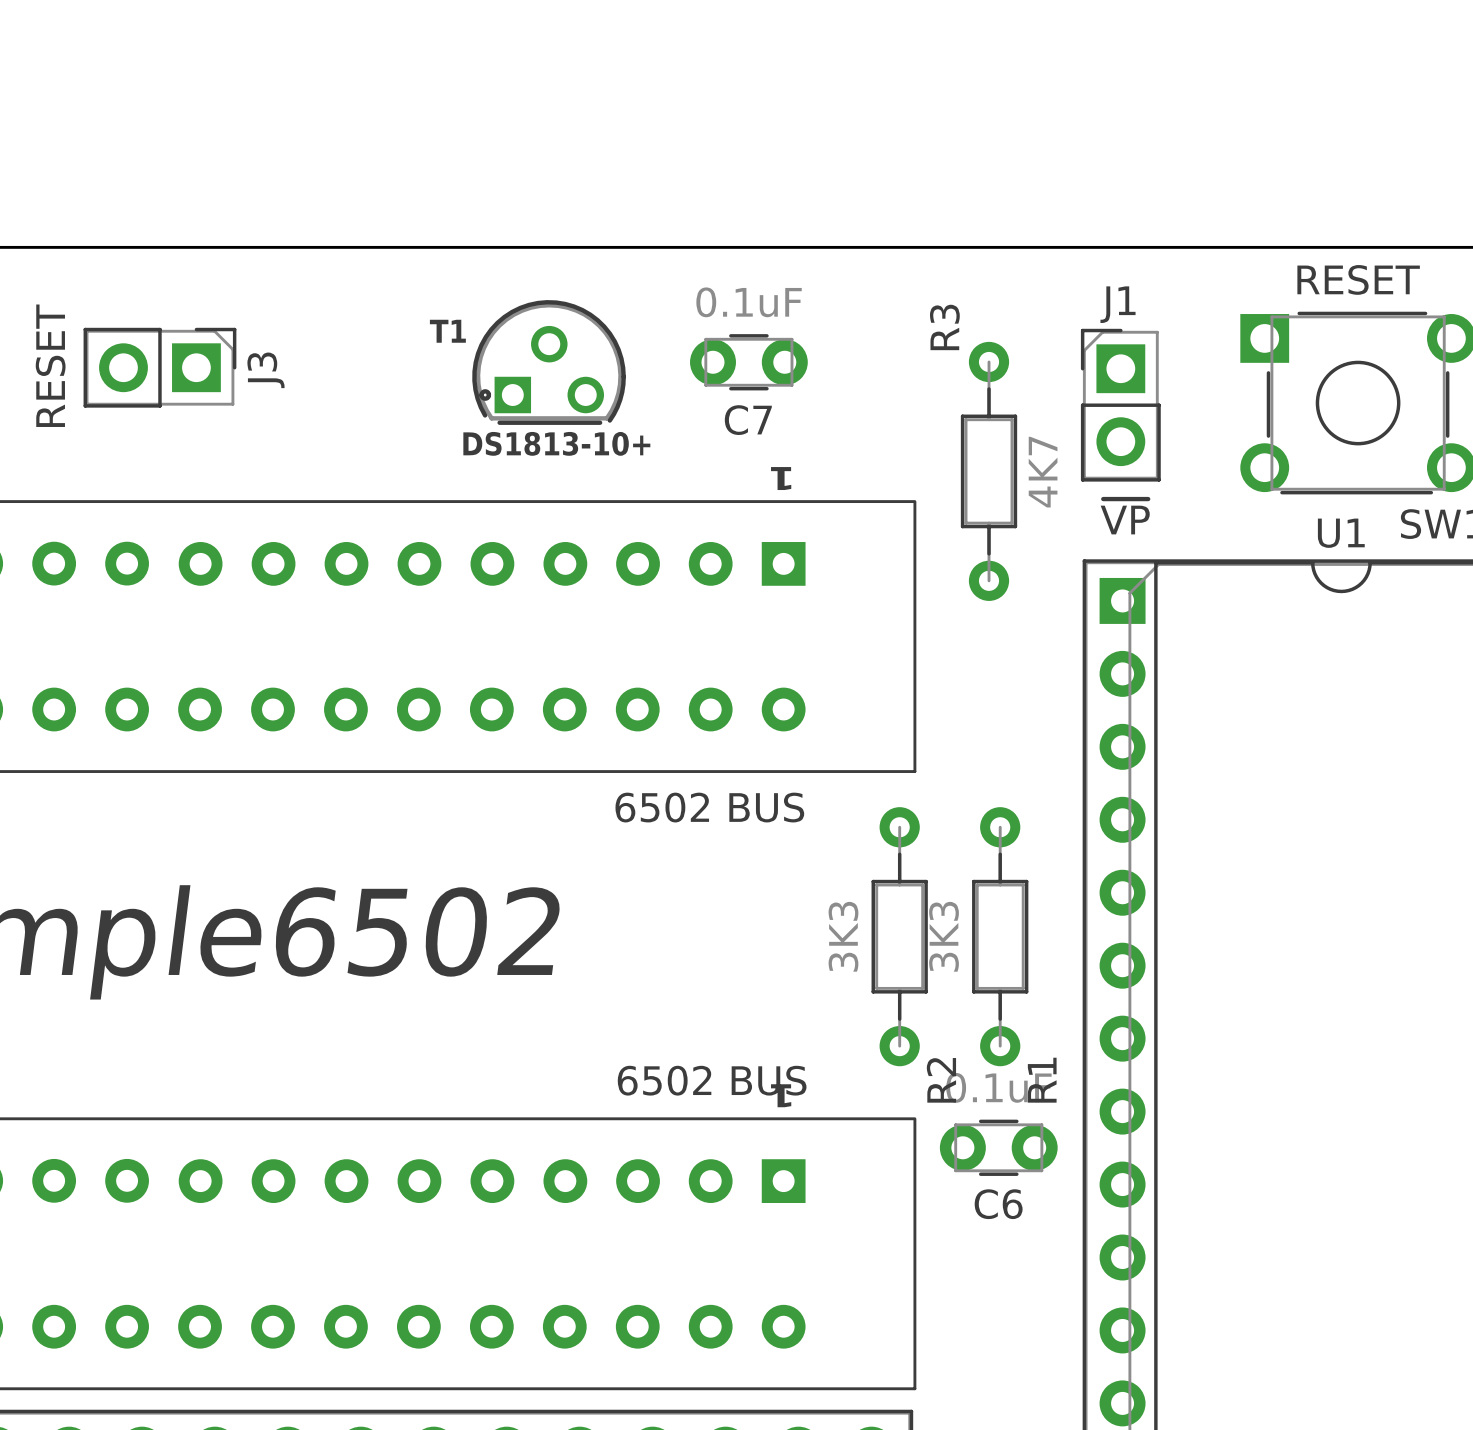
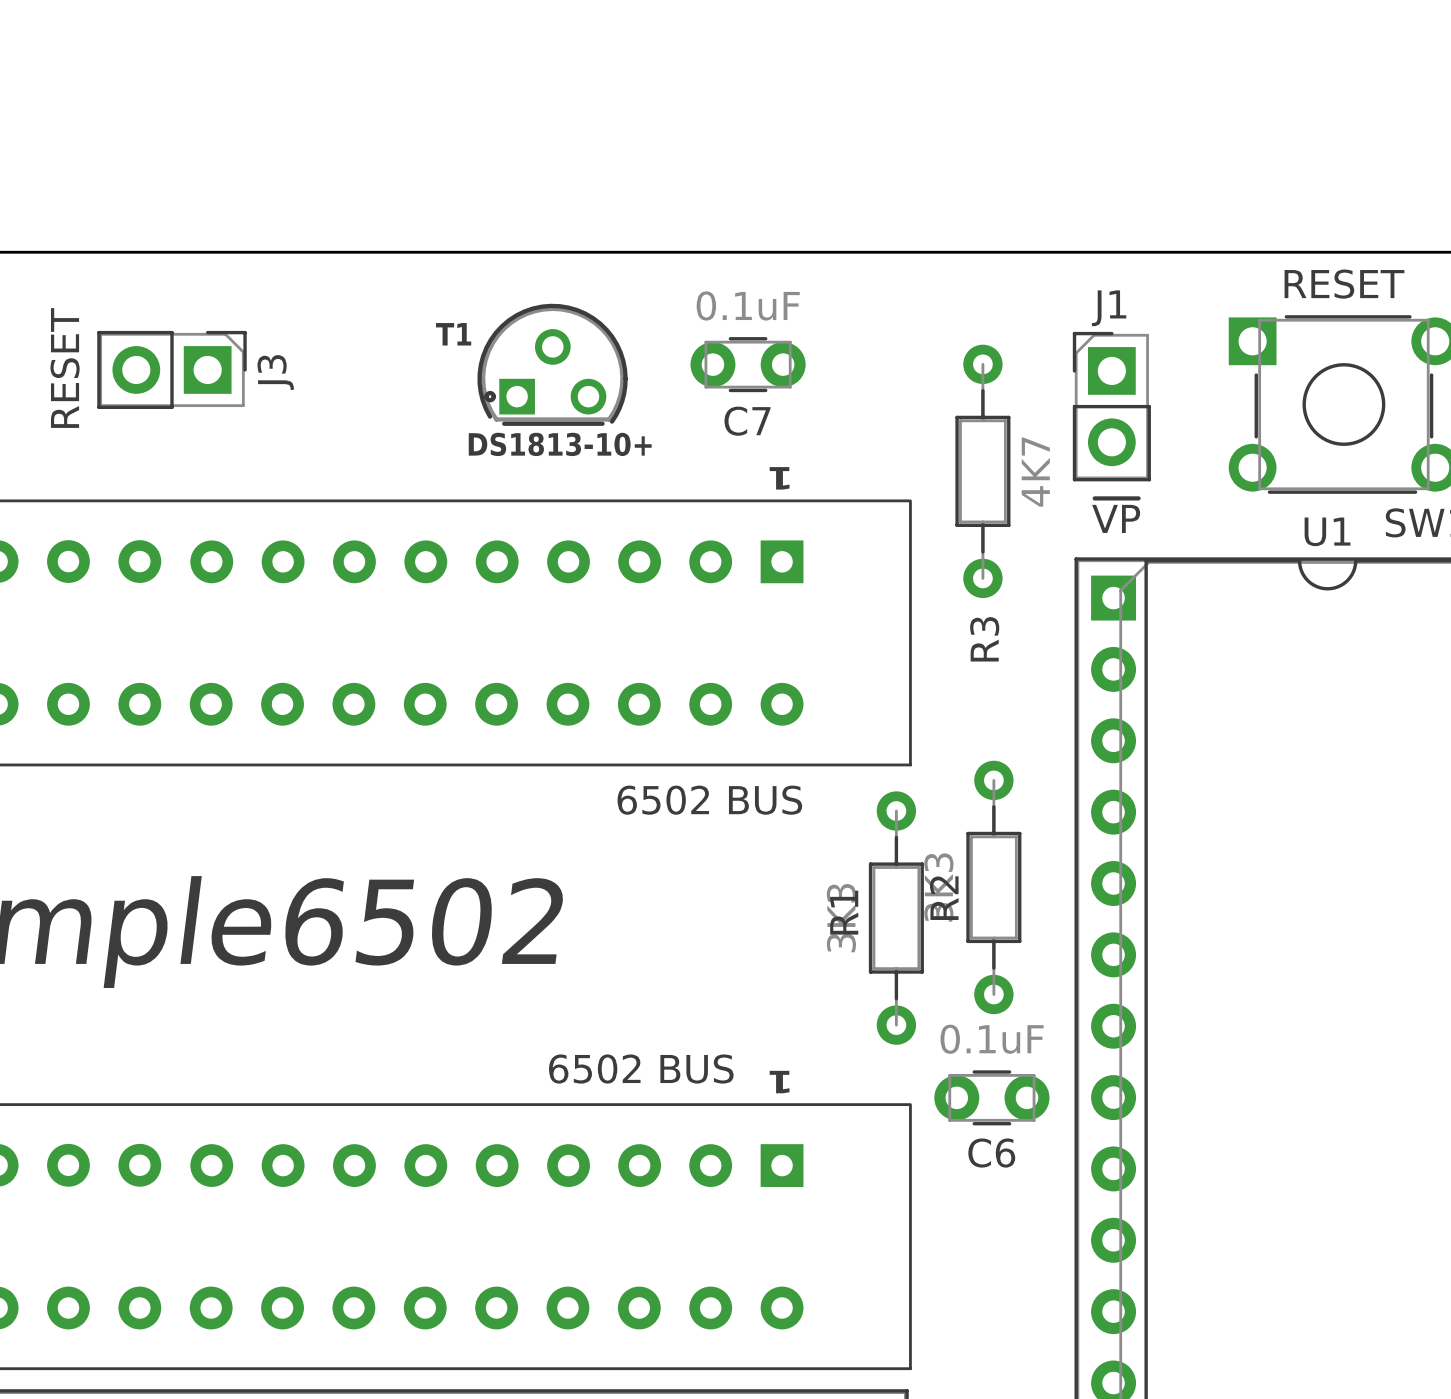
R3 name position: R3 (944, 327) -> R3 (984, 639)
R2 position: (899, 936) -> (993, 887)
R1 position: (1000, 936) -> (896, 918)
part value position: 6502 BUS (712, 1080) -> 6502 BUS (641, 1069)
R2 name position: R2 (941, 1080) -> R2 (944, 898)
R1 name position: R1 (1042, 1080) -> R1 (844, 912)
C6 position: (998, 1147) -> (991, 1097)

